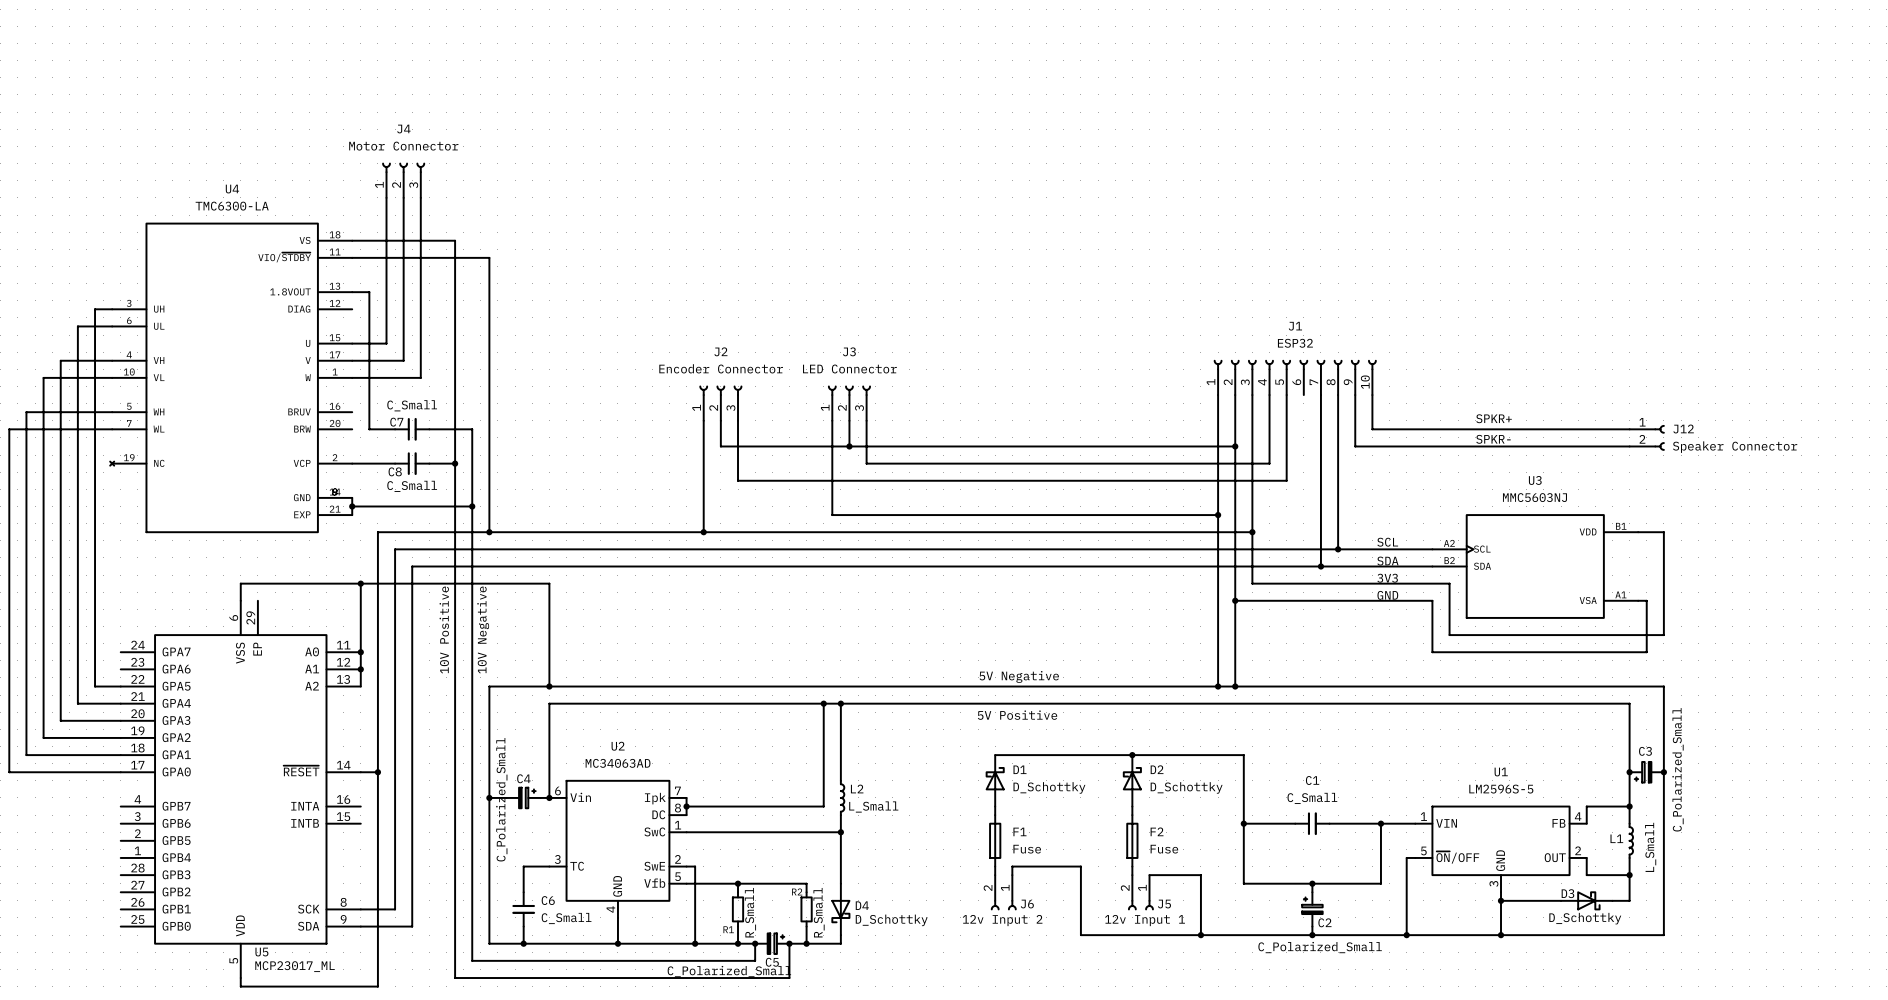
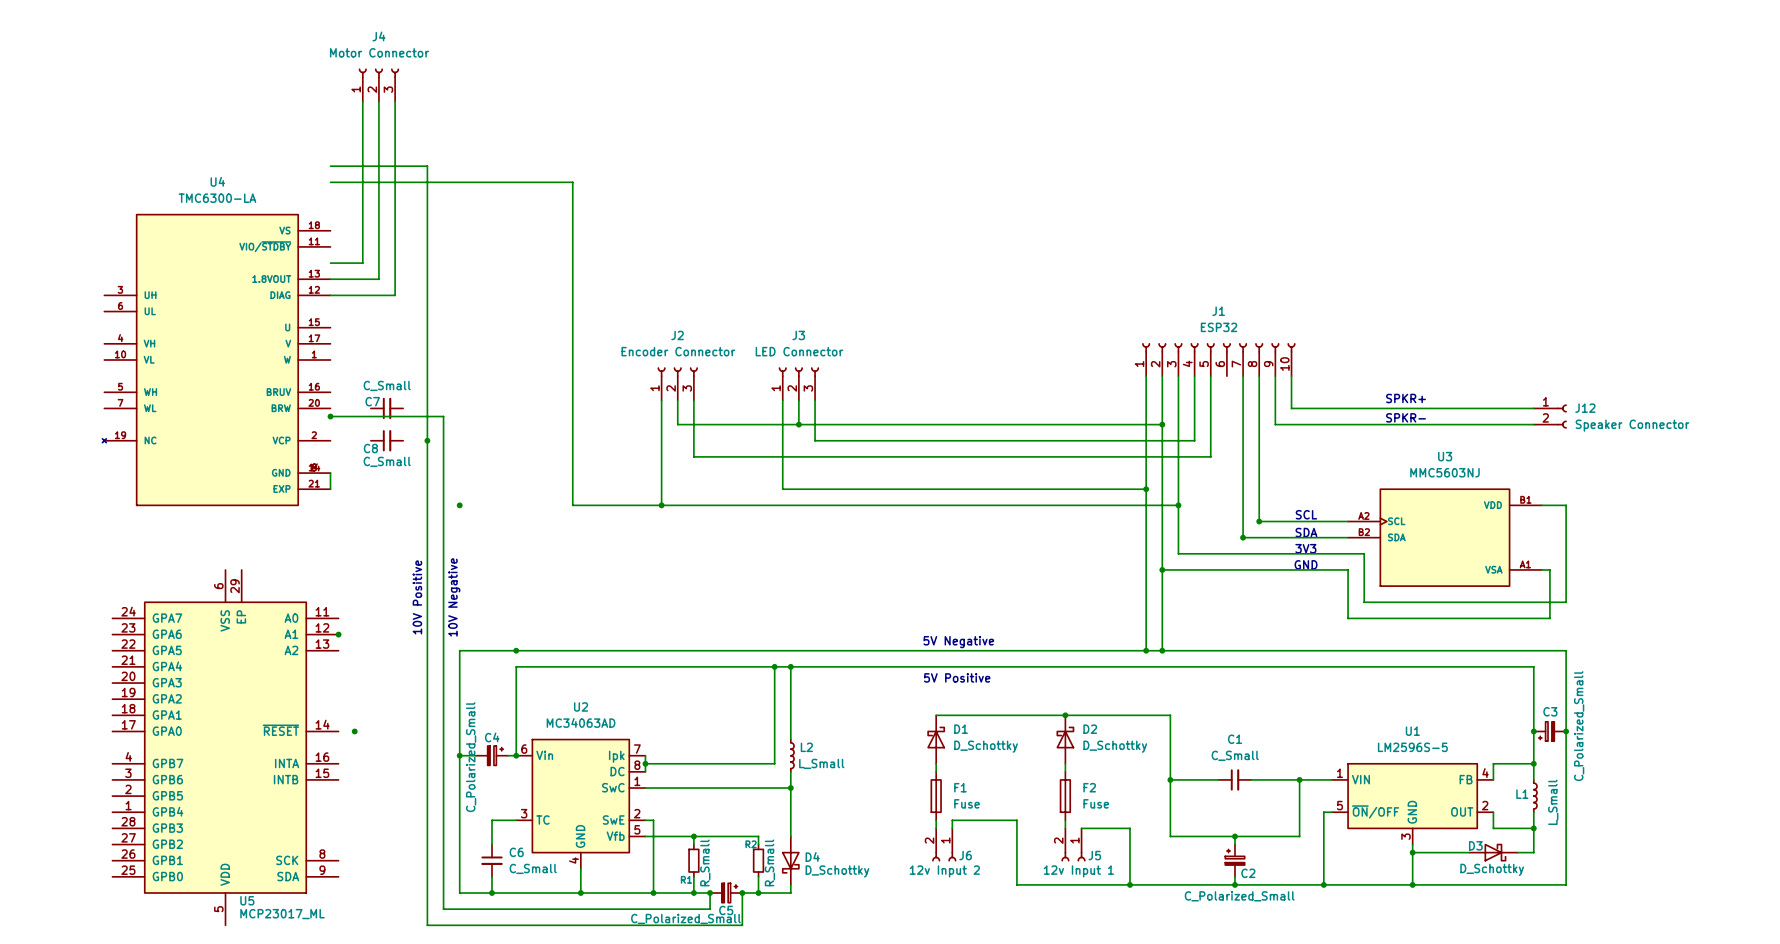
wire: none -> (362, 101) (362, 190)
wire: none -> (378, 101) (378, 190)
wire: none -> (395, 101) (395, 190)
J4 position: (403, 180) -> (378, 85)
wire: (352, 240) (455, 240) -> (330, 166) (427, 166) (427, 230)
wire: (352, 257) (489, 257) (489, 532) -> none
wire: (386, 275) (386, 343) (352, 343) -> (362, 263) (330, 263)
wire: (369, 292) (369, 429) (395, 429) -> none
wire: (403, 292) (403, 360) (352, 360) -> (378, 279) (346, 279)
wire: (112, 309) (95, 309) (95, 686) (120, 686) -> none
wire: (420, 309) (420, 377) (352, 377) -> (395, 295) (330, 295)
wire: (112, 326) (77, 326) (77, 703) (120, 703) -> none
wire: (112, 360) (60, 360) (60, 720) (120, 720) -> none
wire: (112, 377) (43, 377) (43, 737) (120, 737) -> none
wire: (112, 412) (26, 412) (26, 755) (120, 755) -> none
wire: (112, 429) (9, 429) (9, 772) (120, 772) -> none
wire: (429, 429) (472, 429) (472, 437) -> (330, 416) (443, 416)
junction: none -> (330, 416)
wire: (352, 463) (395, 463) -> none
wire: (429, 463) (455, 463) -> none
wire: (352, 506) (472, 506) -> none
junction: (352, 506) -> none
junction: (472, 506) -> none
wire: (609, 532) (377, 532) (377, 986) (240, 986) (240, 978) -> (572, 505) (572, 182) (330, 182)
wire: (1338, 549) (395, 549) (395, 909) (360, 909) -> none
wire: (1320, 566) (412, 566) (412, 926) (360, 926) -> none
wire: (360, 583) (360, 686) -> none
junction: (360, 583) -> none
wire: (240, 600) (240, 583) (549, 583) (549, 686) -> none
junction: (360, 652) -> none
wire: (360, 772) (377, 772) -> none

